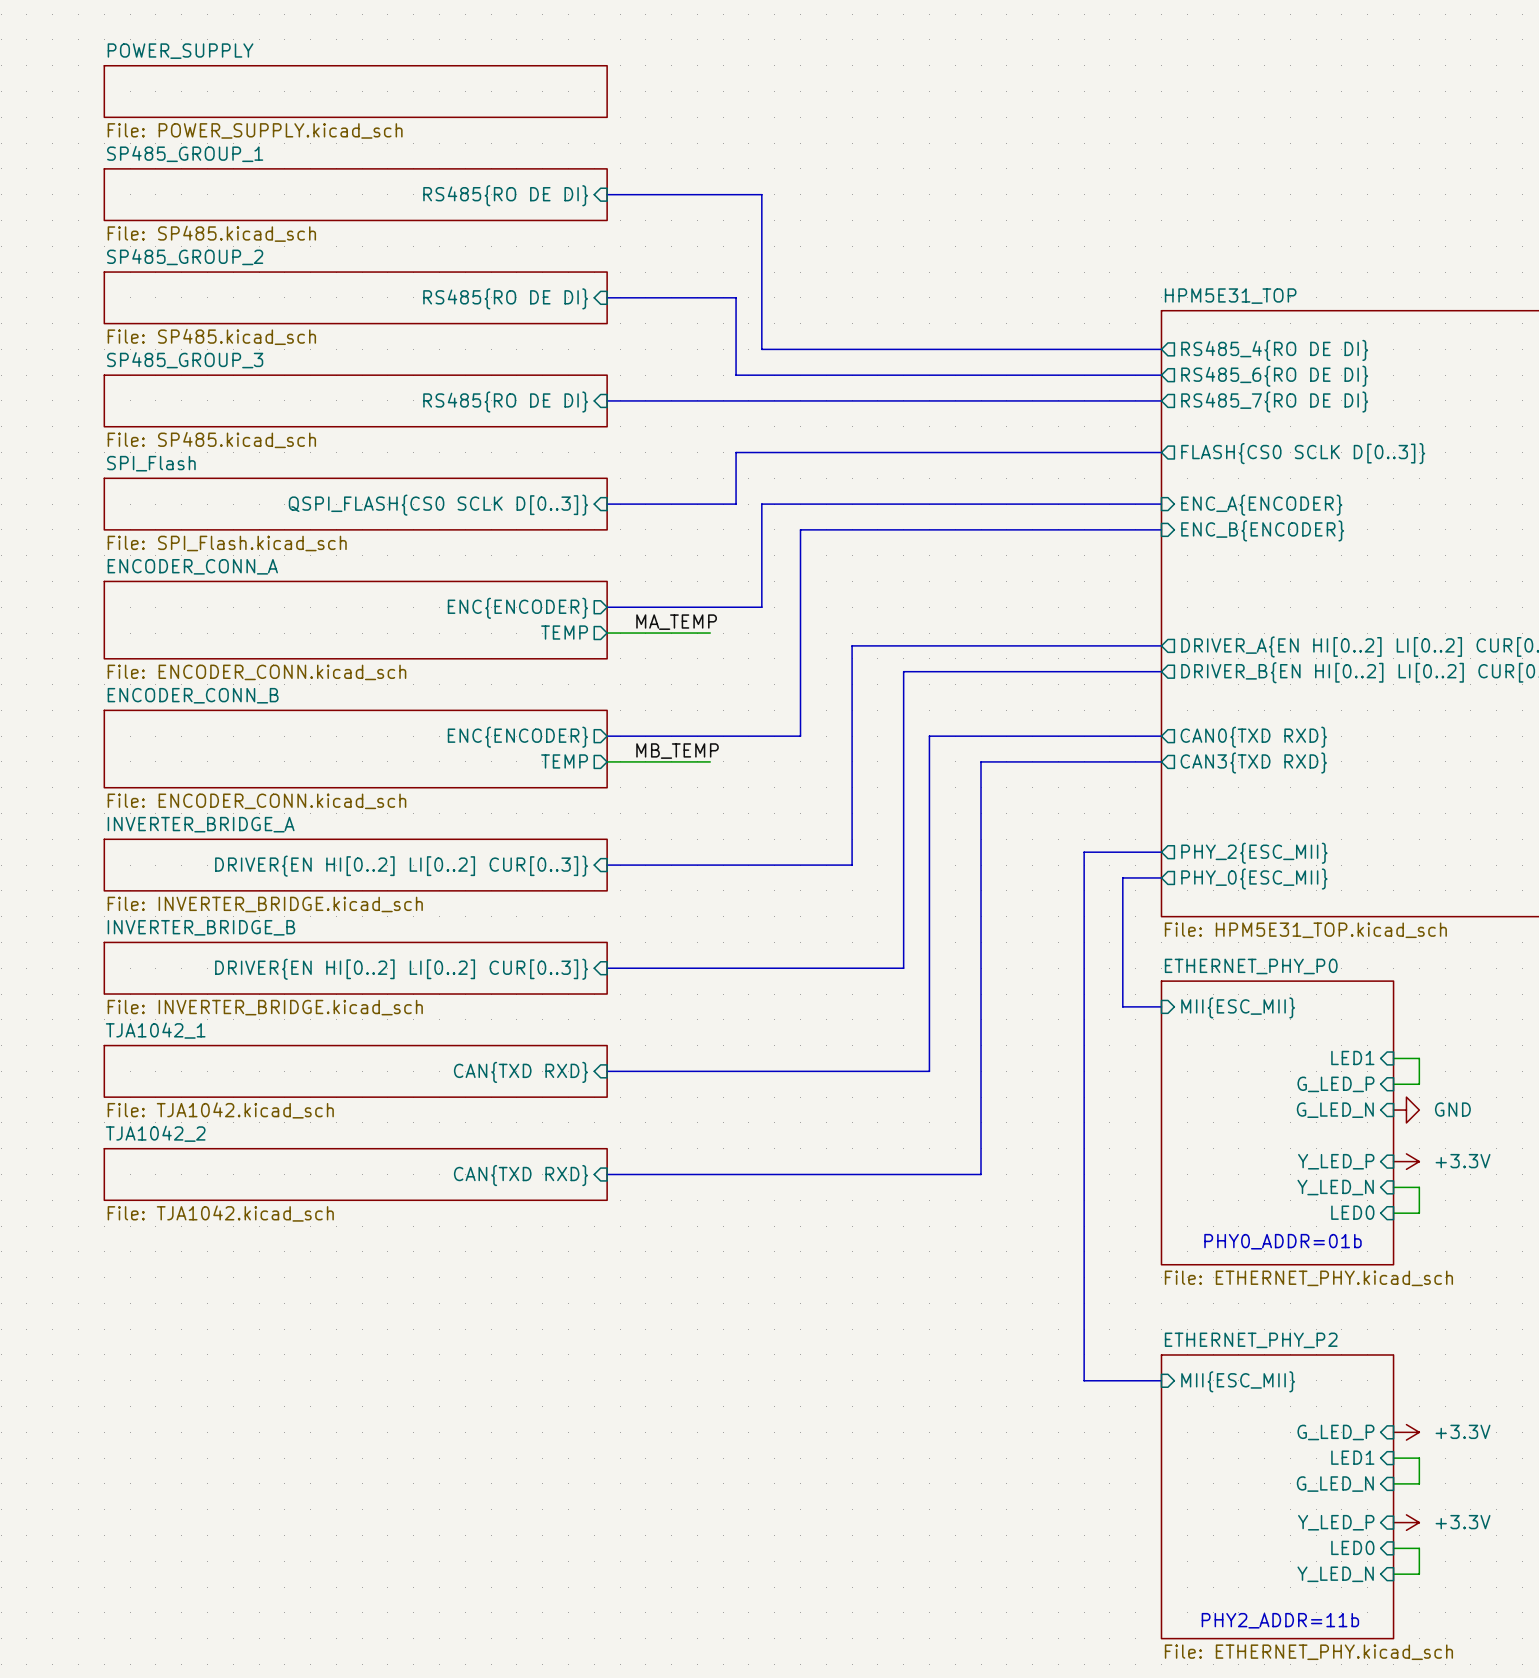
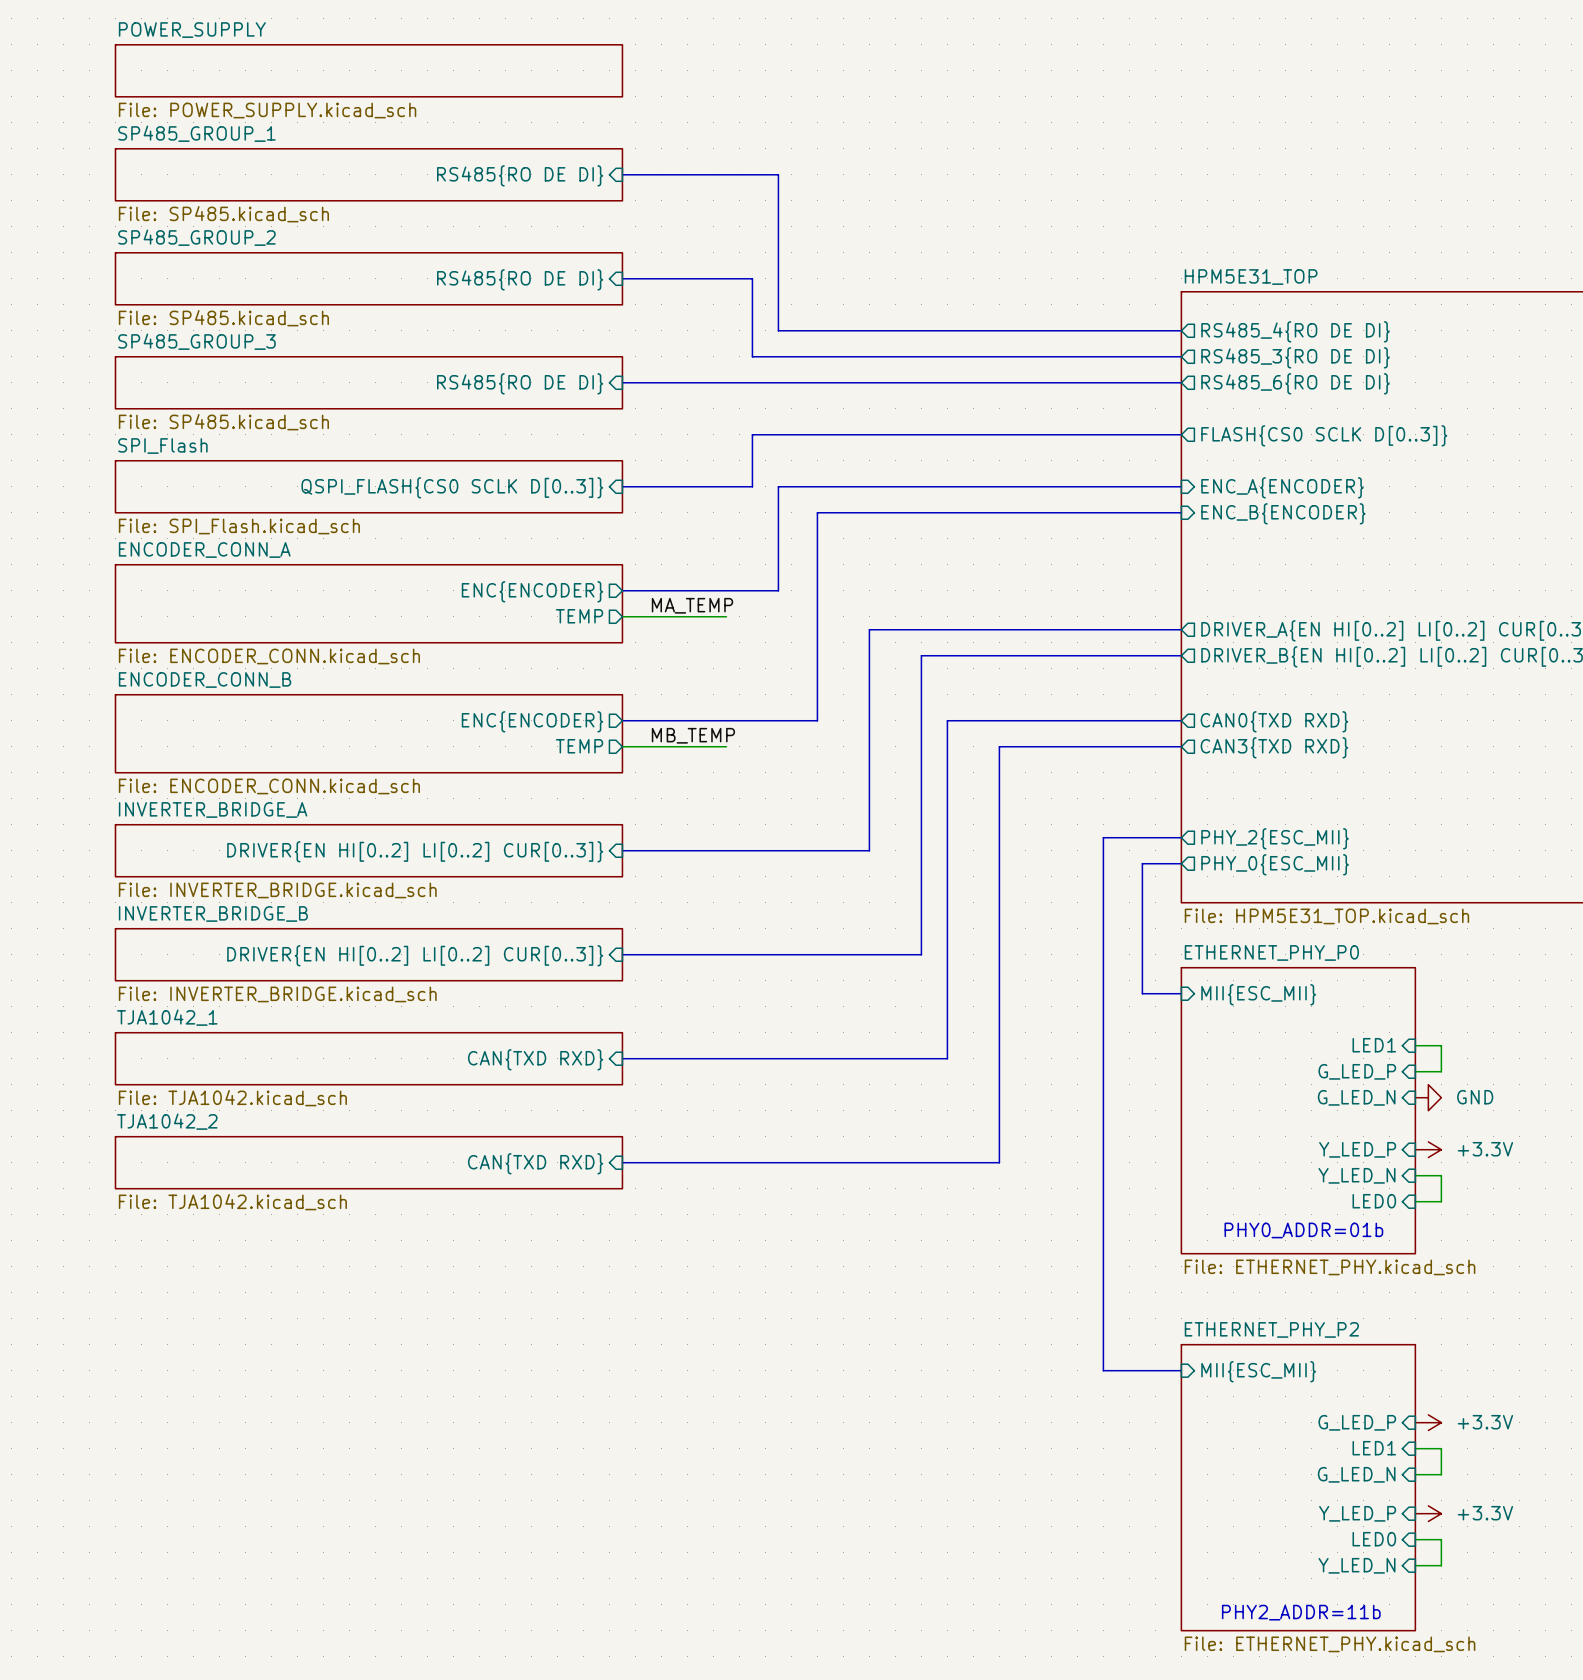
sheet pin: RS485_6{RO DE DI} (1274, 376) -> RS485_3{RO DE DI} (1295, 357)
sheet pin: RS485_7{RO DE DI} (1274, 402) -> RS485_6{RO DE DI} (1295, 383)

